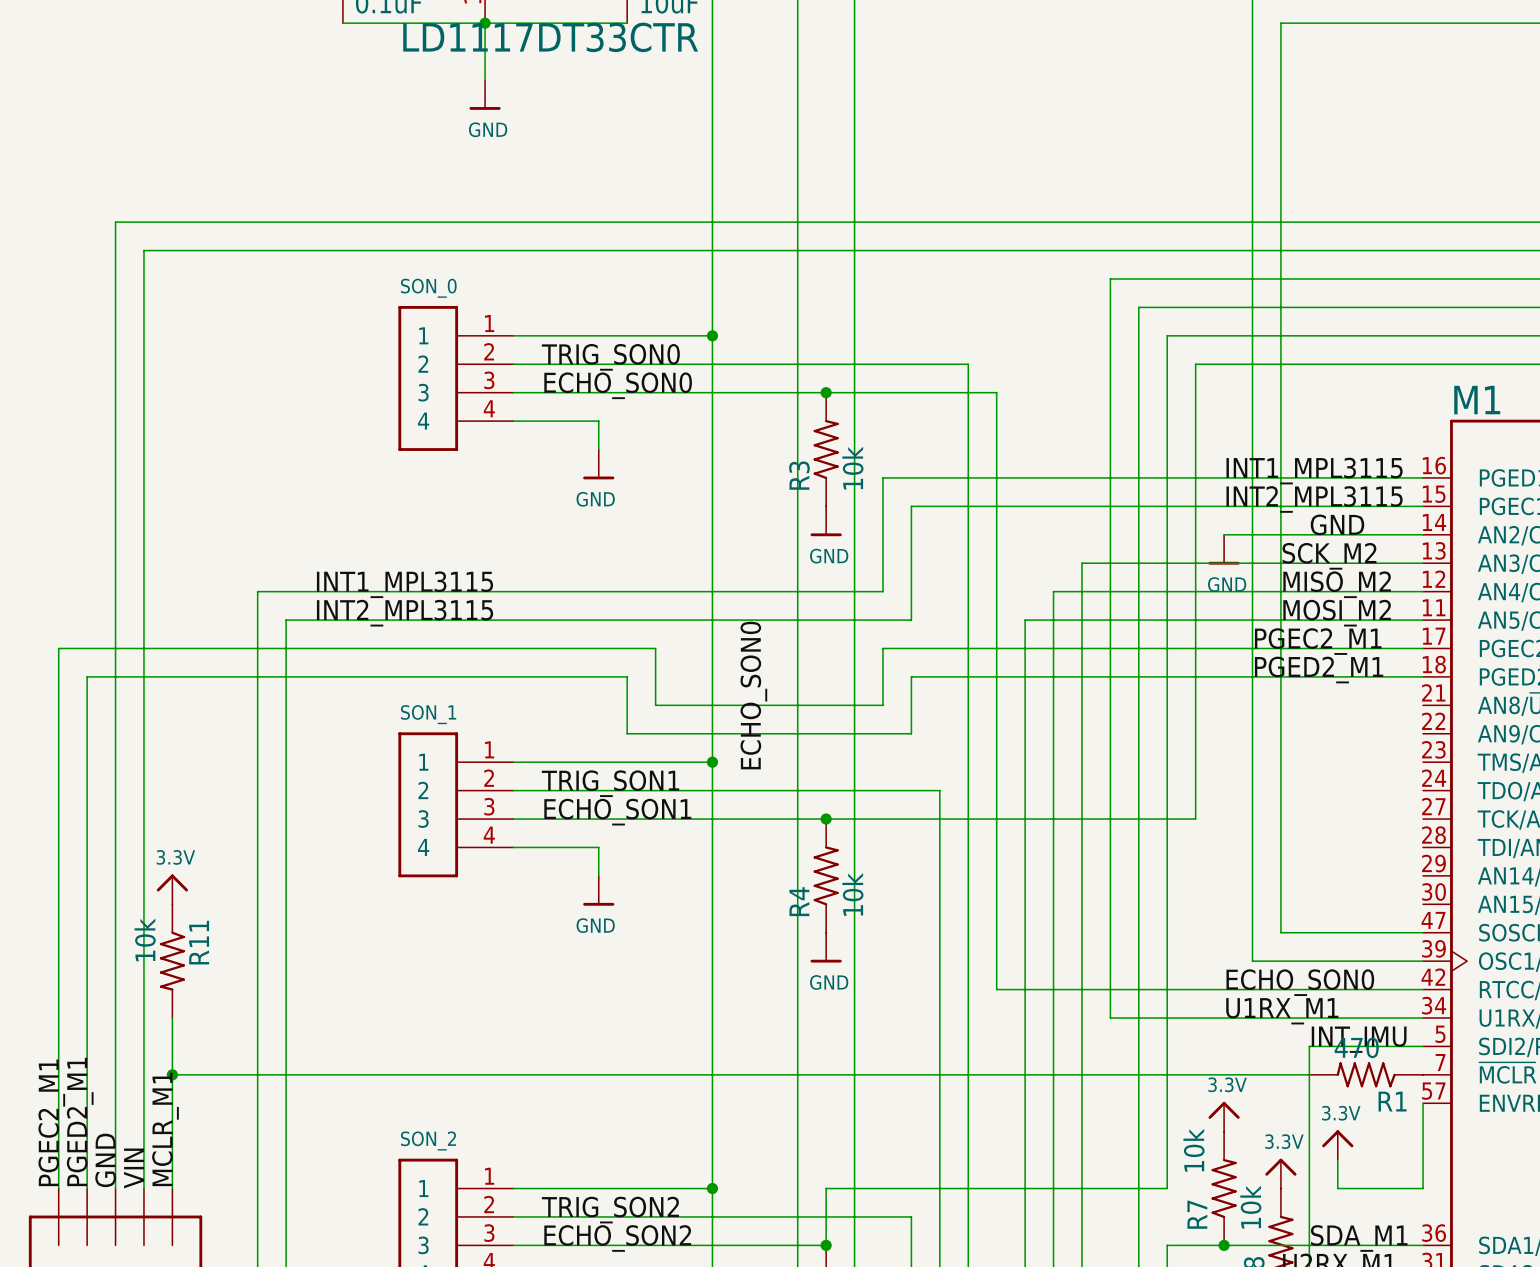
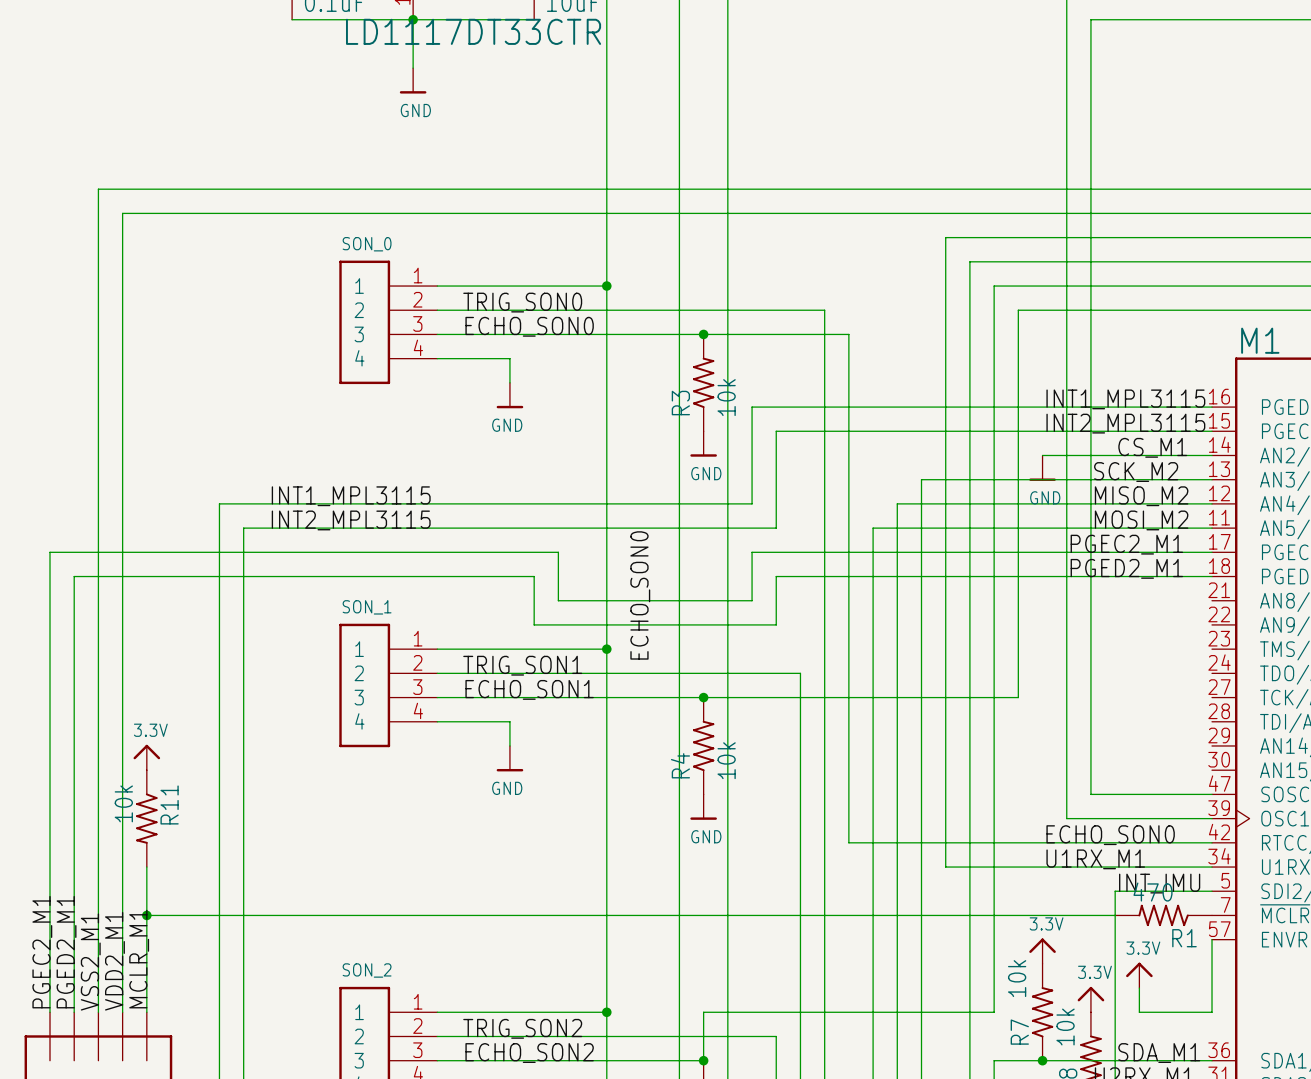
label: GND (1337, 524) -> CS_M1 (1152, 447)
label: GND (105, 1160) -> VSS2_M1 (90, 962)
label: VIN (134, 1168) -> VDD2_M1 (114, 961)

